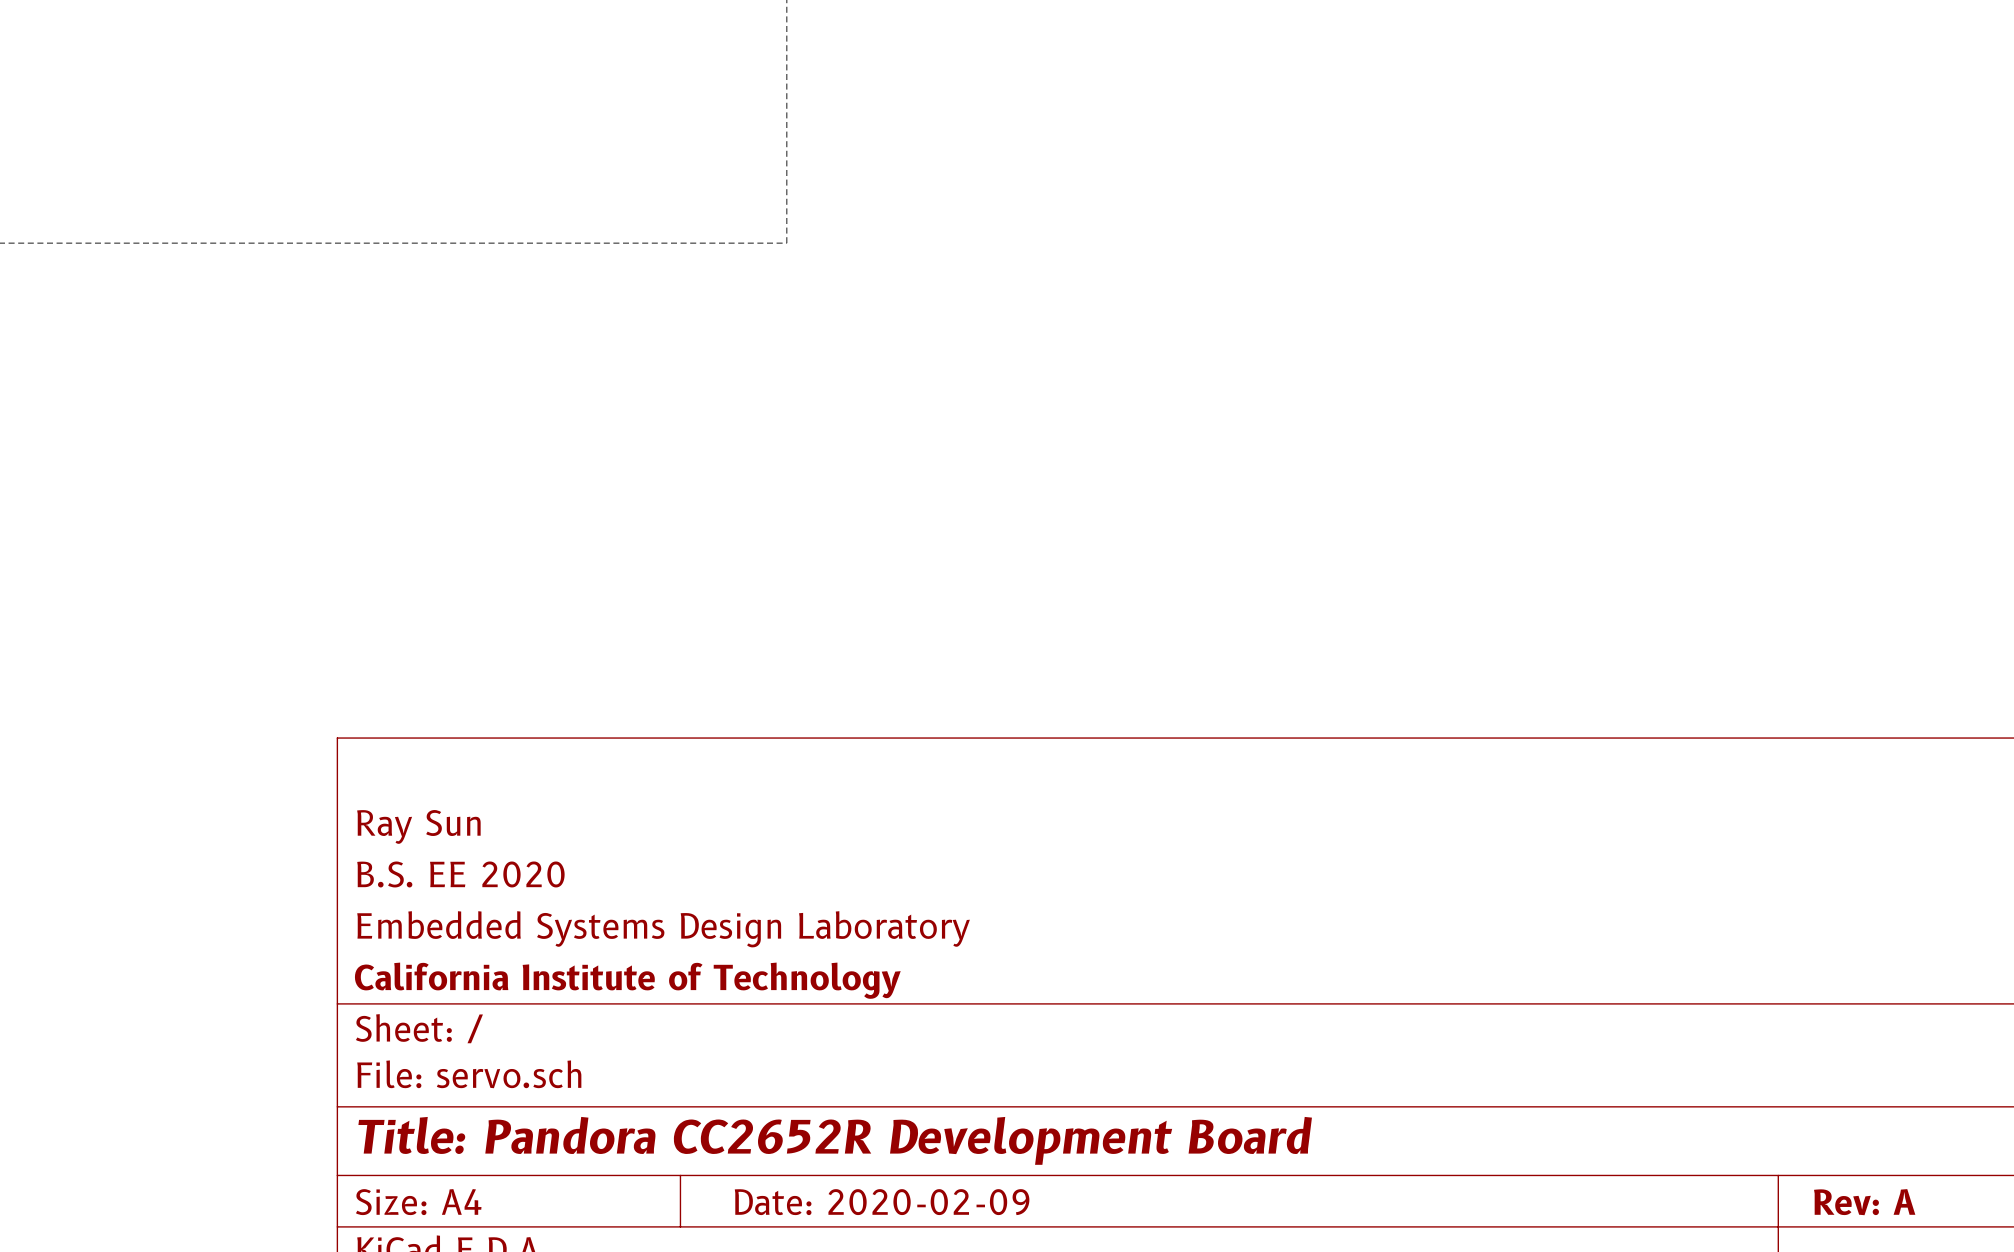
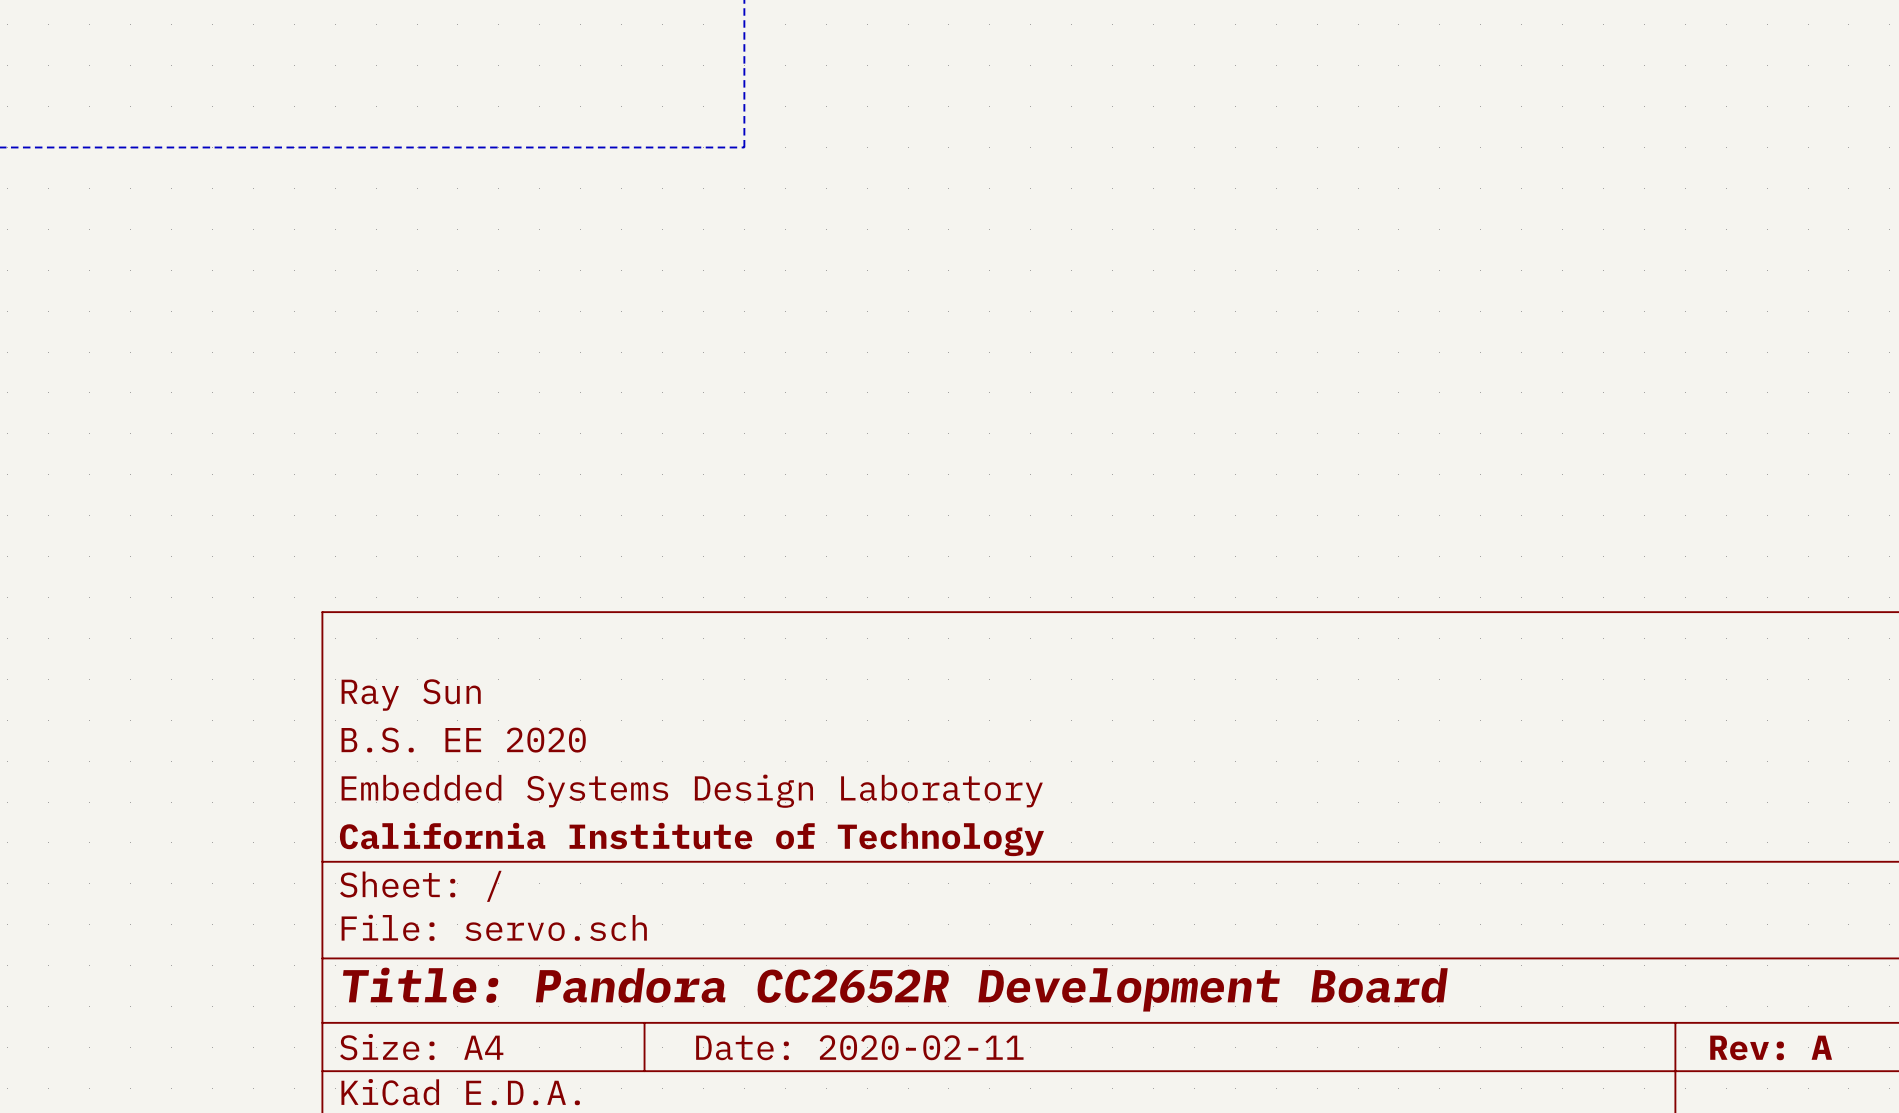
title block: Date: 2020-02-09 (882, 1202) -> Date: 2020-02-11 (859, 1047)

